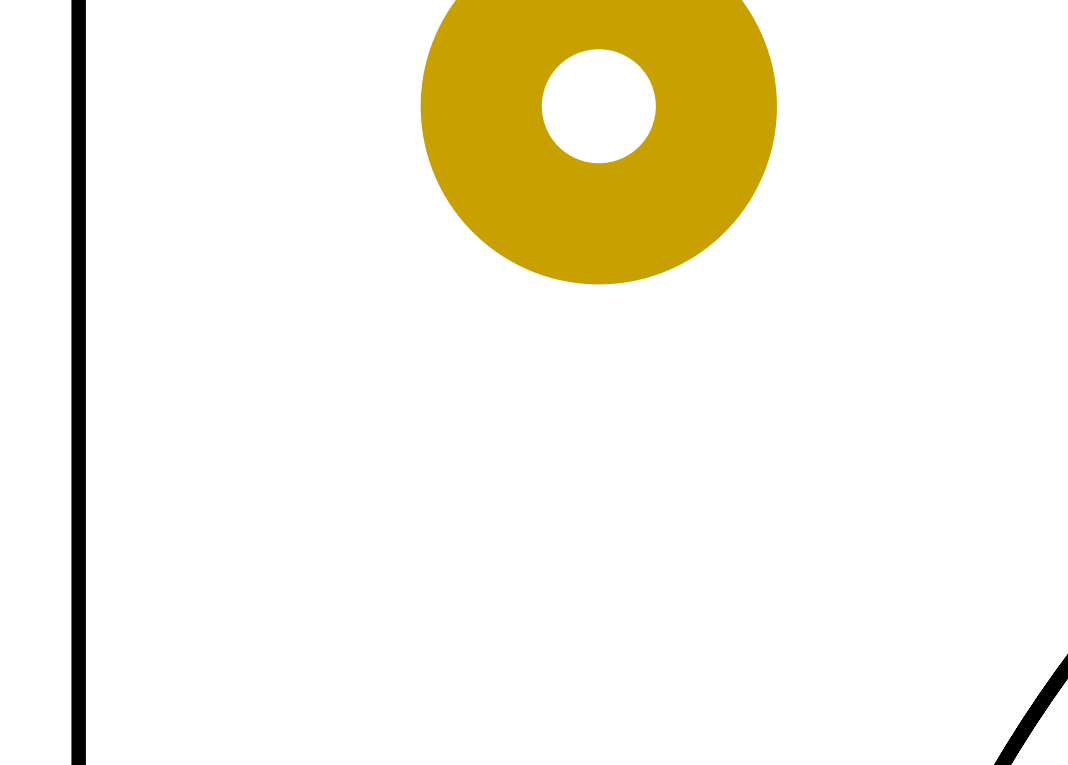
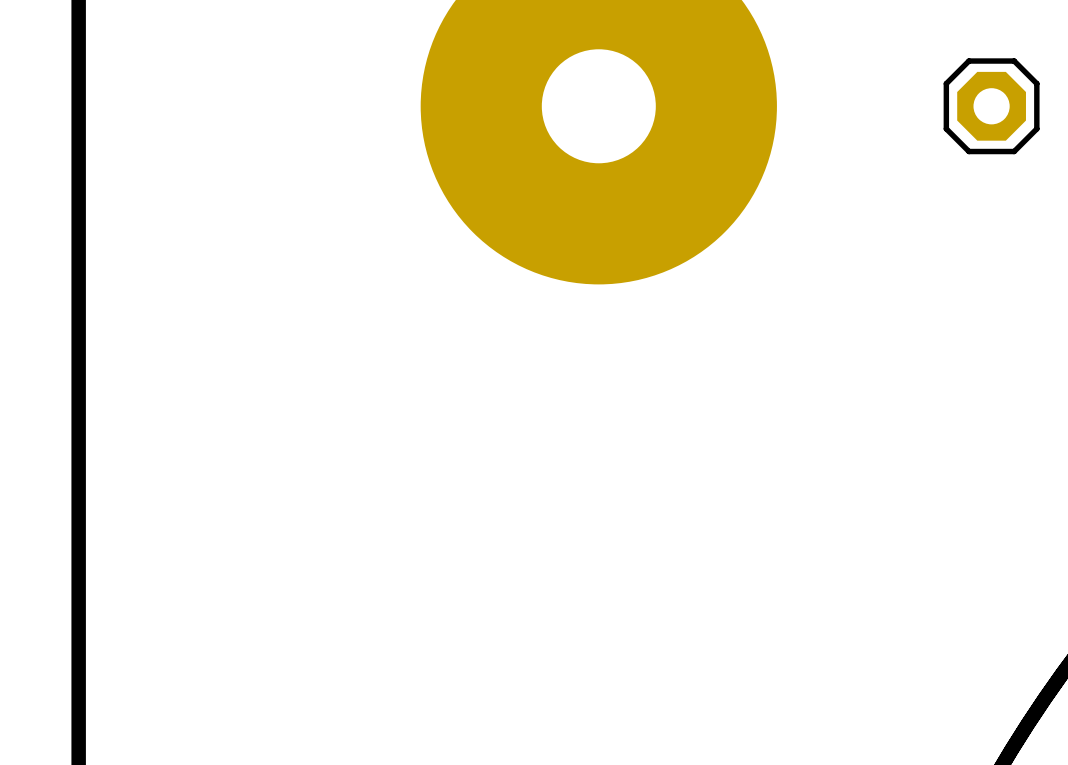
part: none -> (991, 106)

